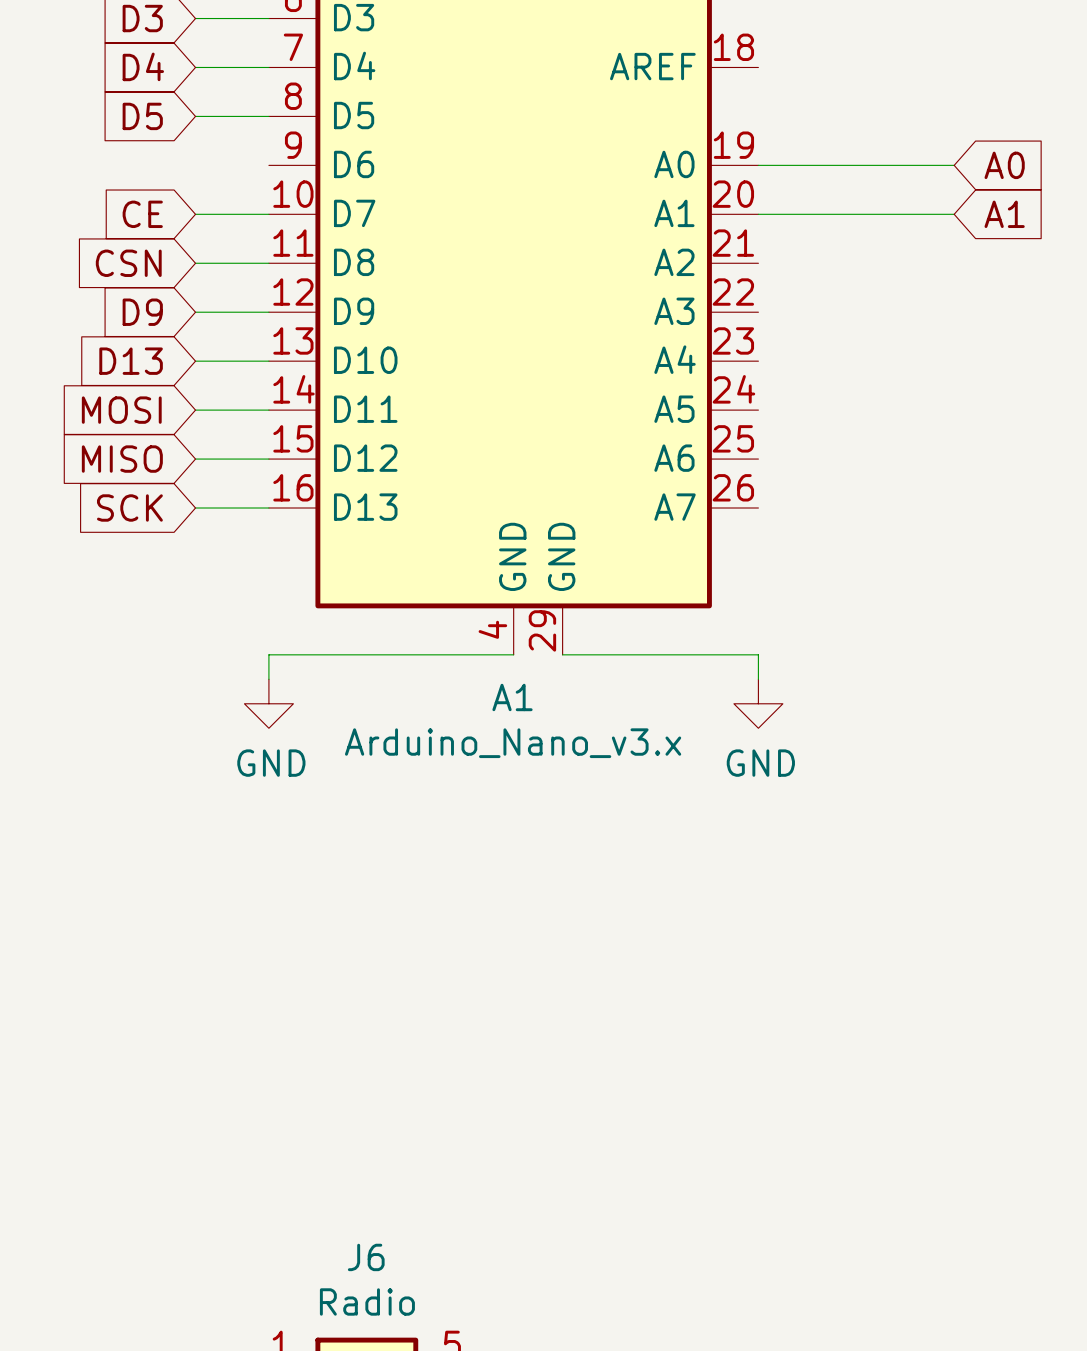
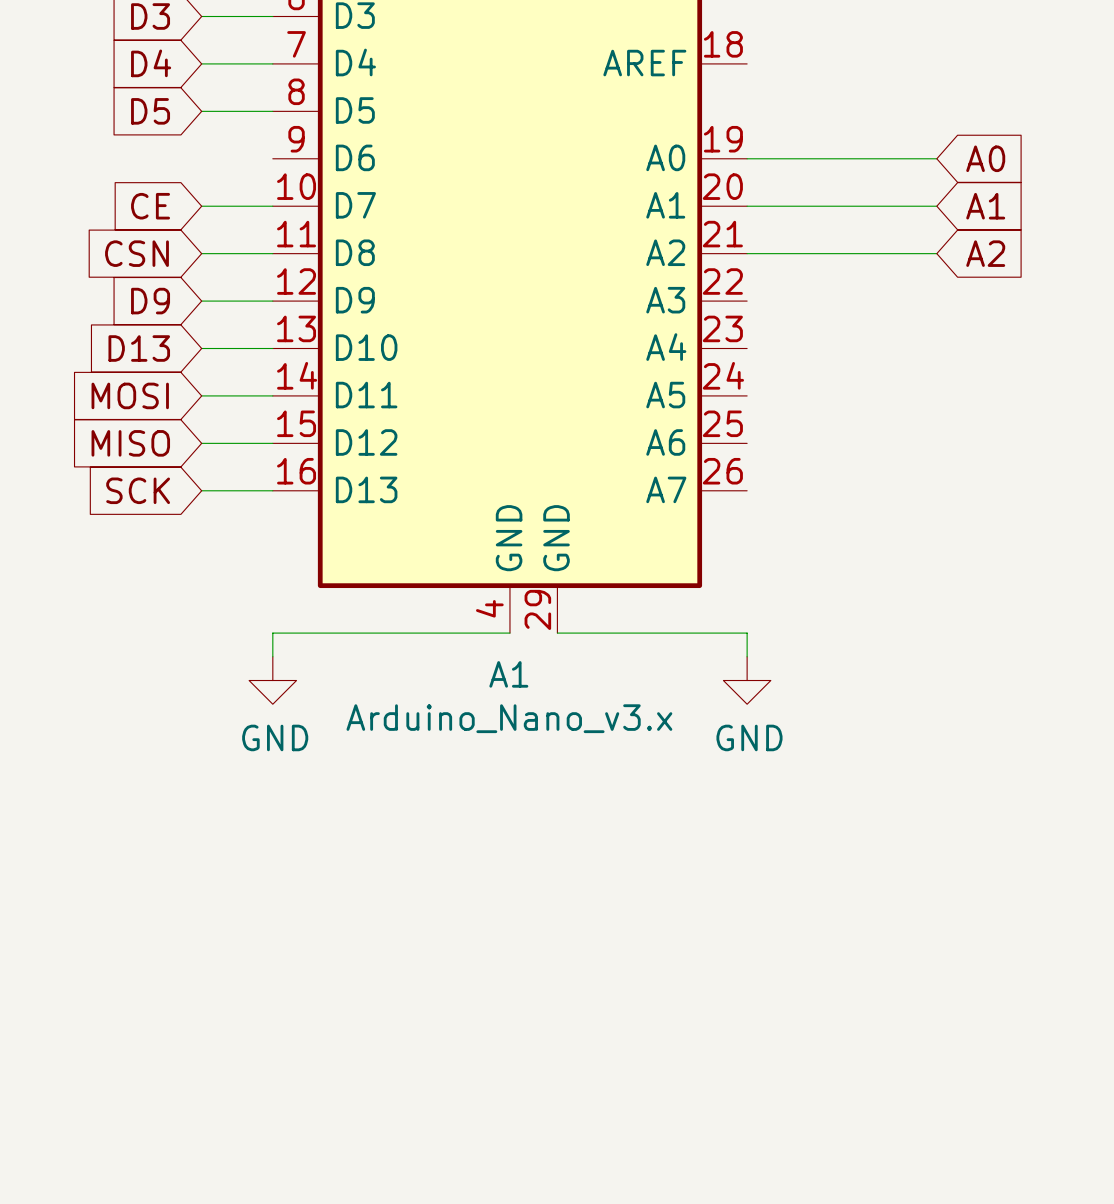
wire: none -> (747, 253) (936, 253)
global label: none -> A2 (985, 253)

